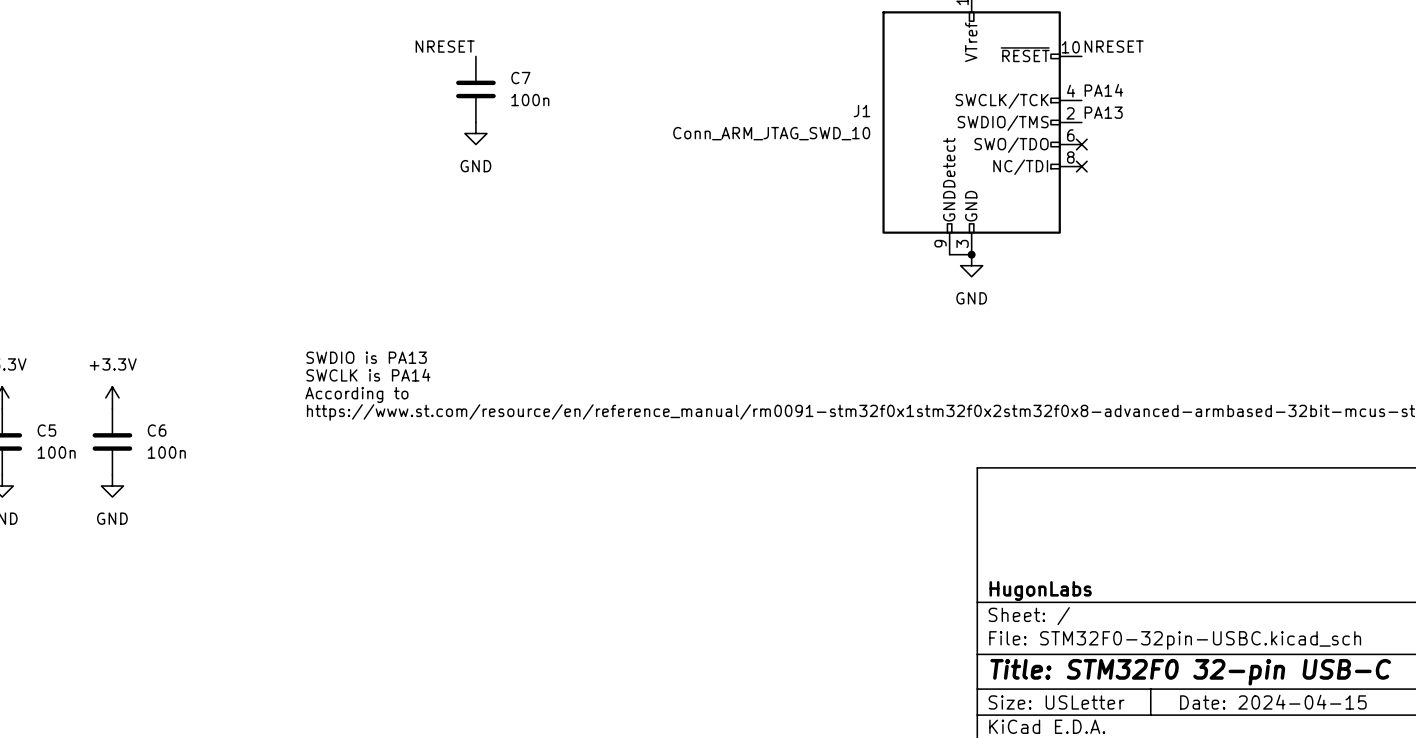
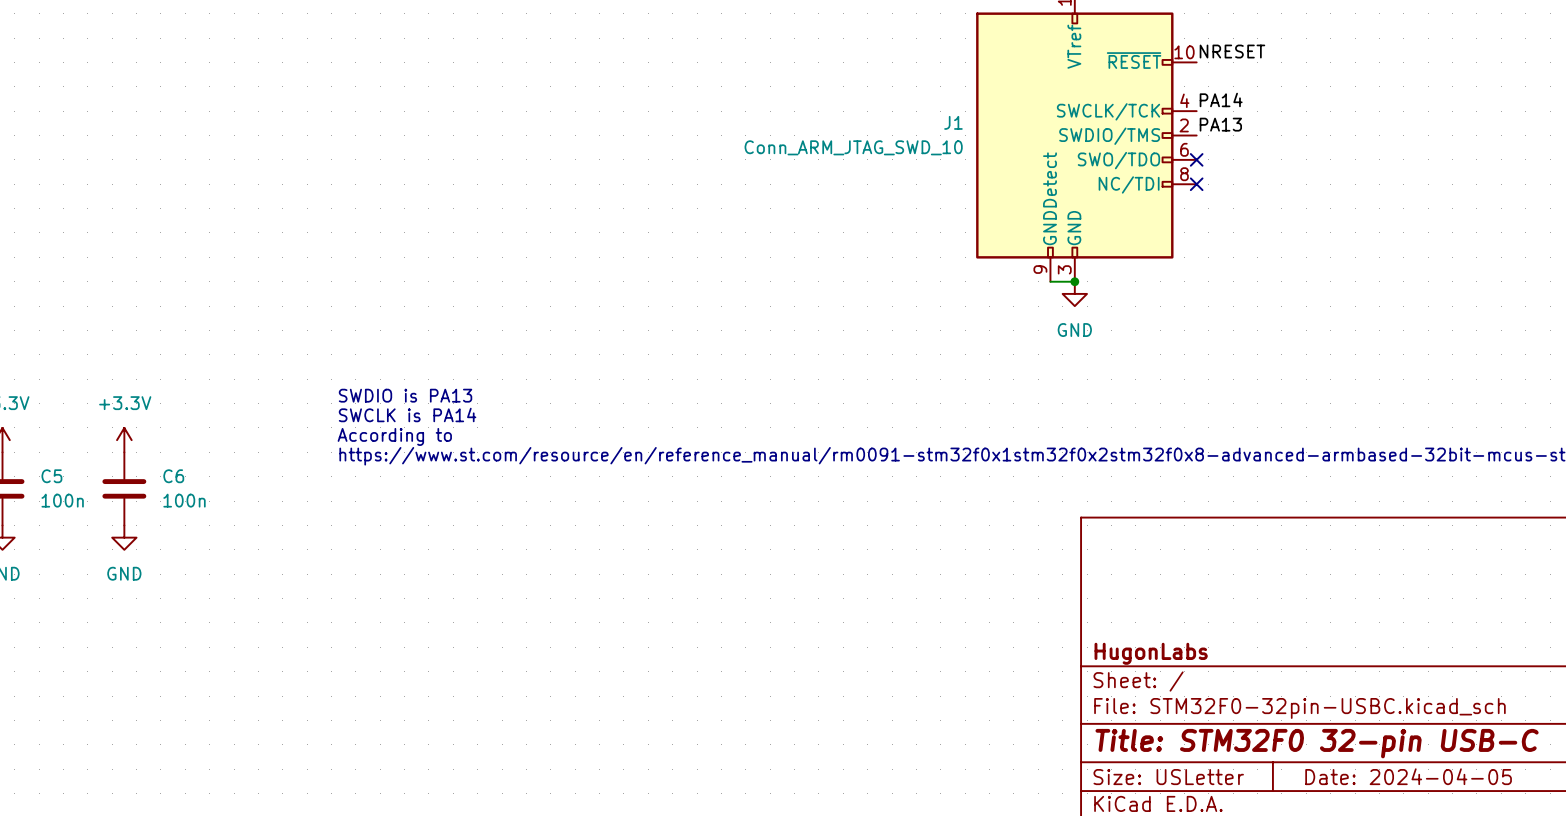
label: NRESET (445, 46) -> none
C7: 100n (475, 89) -> none
power symbol: GND (475, 133) -> none
title block: Date: 2024-04-15 (1273, 702) -> Date: 2024-04-05 (1408, 776)

